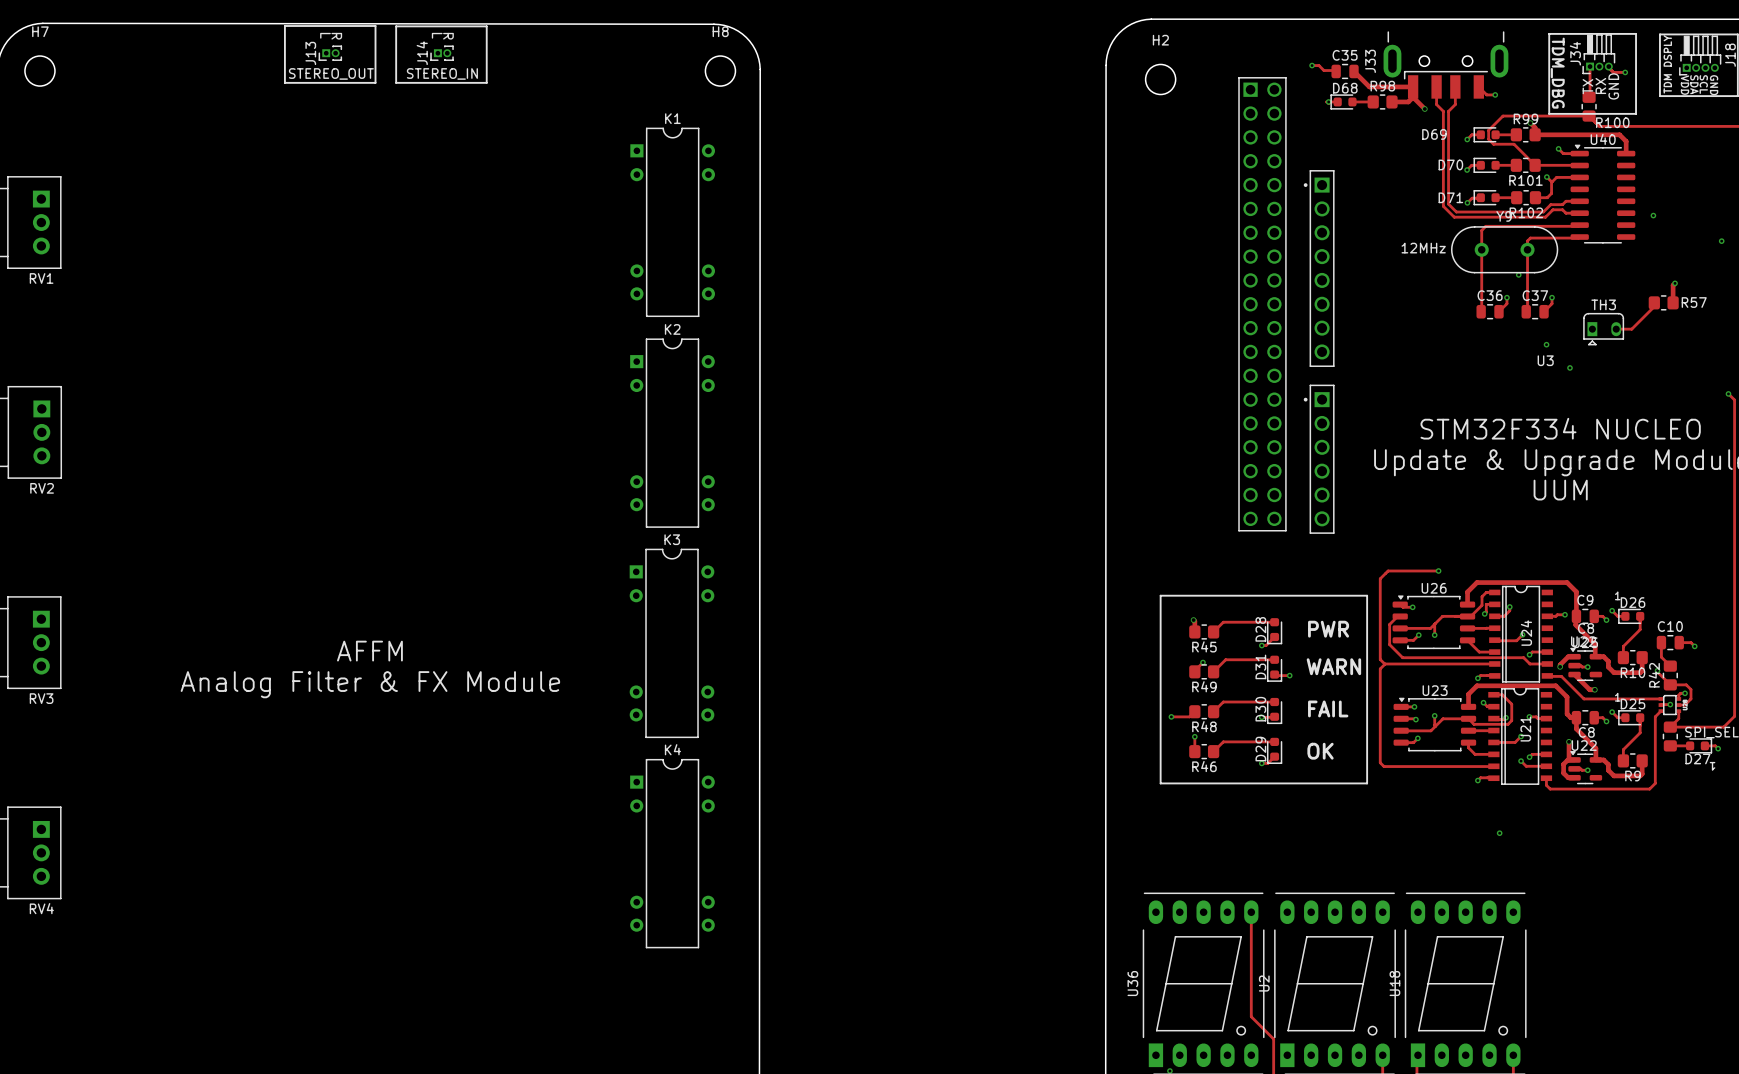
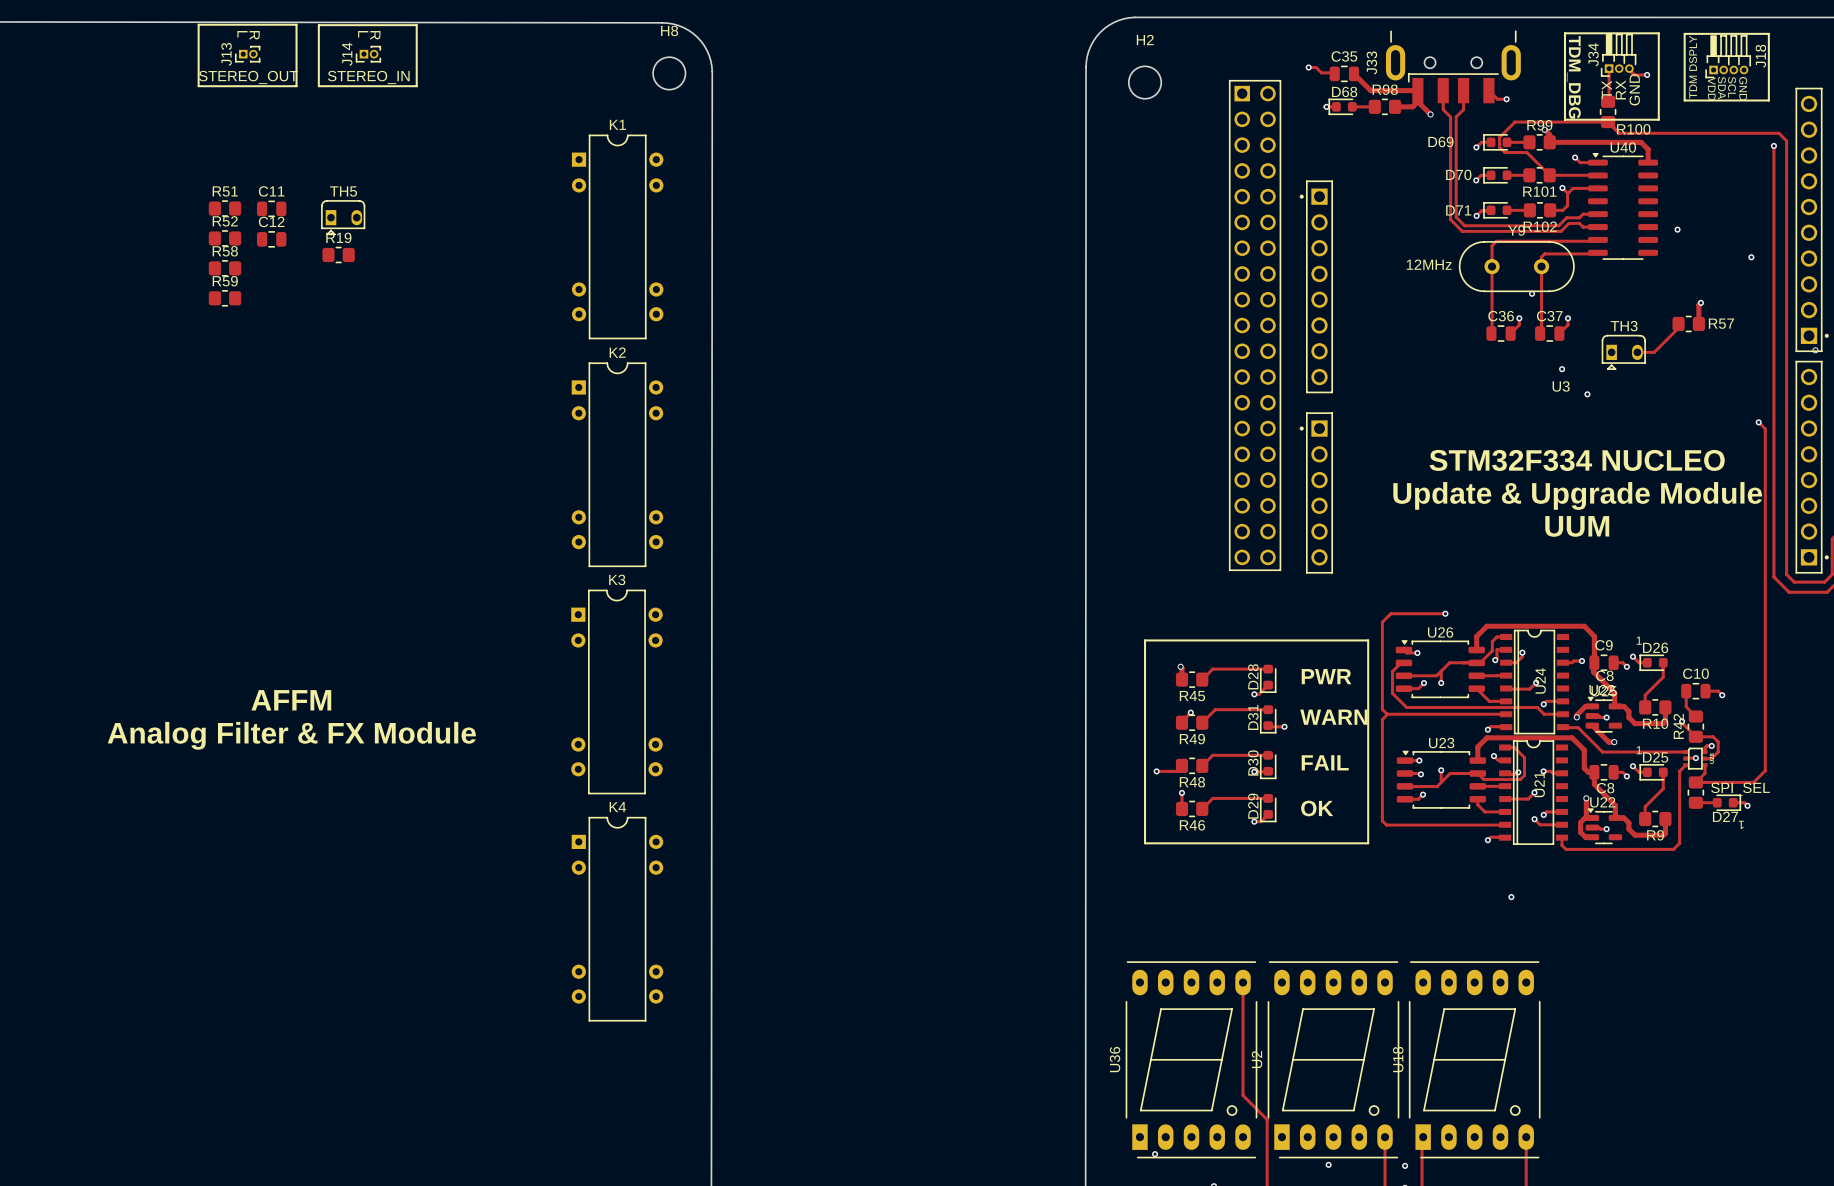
R51: none -> (225, 208)
C11: none -> (271, 208)
TH5: none -> (343, 217)
R52: none -> (225, 238)
C12: none -> (271, 239)
R19: none -> (338, 254)
R58: none -> (225, 268)
R59: none -> (225, 298)

